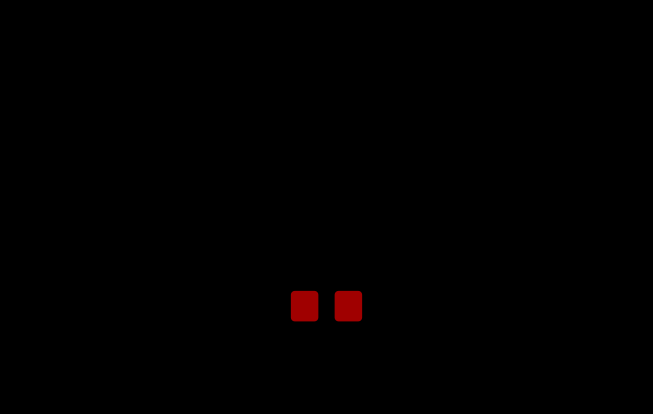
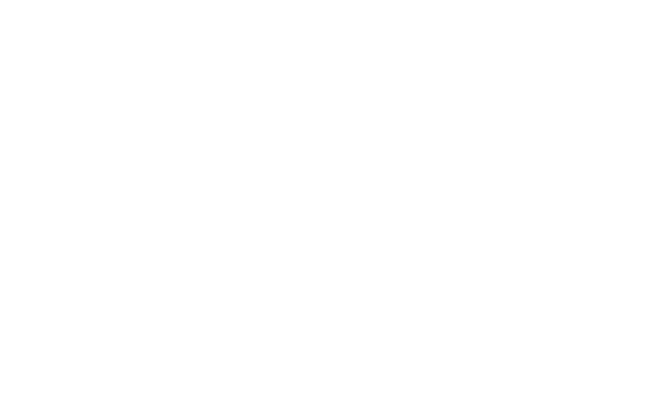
part: (326, 306) -> none

